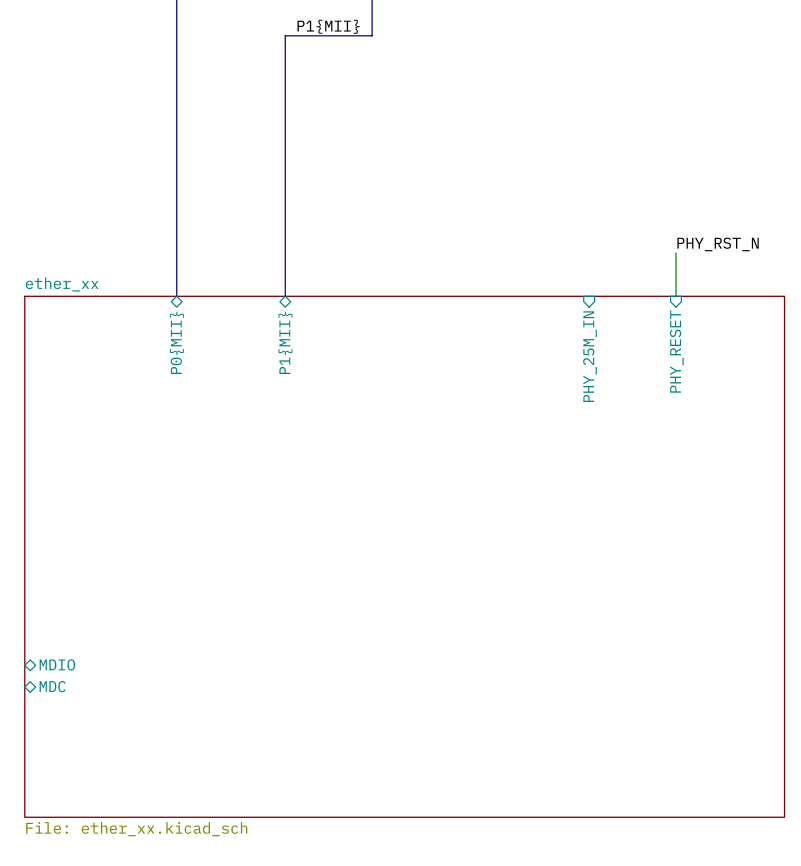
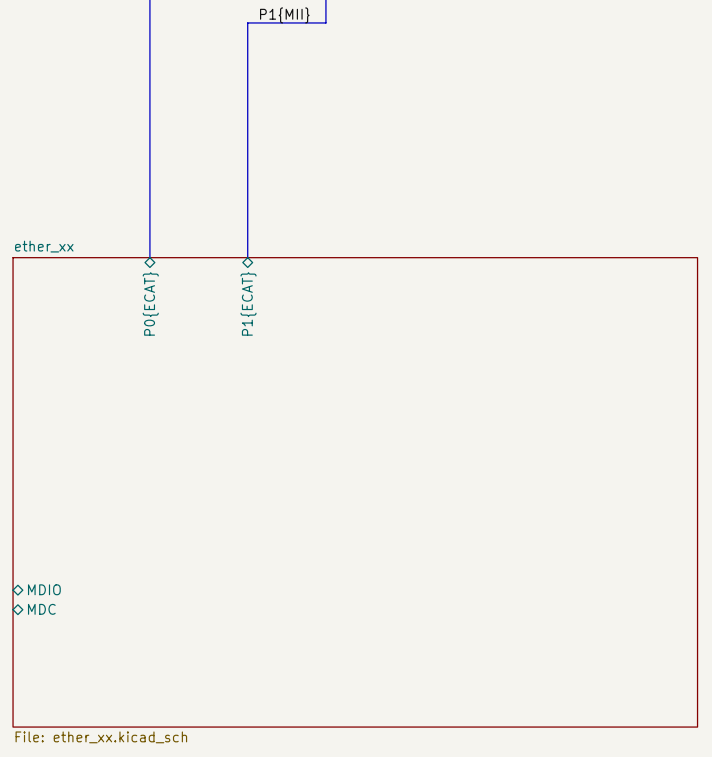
label: PHY_RST_N (718, 244) -> none
wire: (675, 252) (675, 296) -> none
sheet pin: P0{MII} (176, 342) -> P0{ECAT} (150, 303)
sheet pin: P1{MII} (285, 342) -> P1{ECAT} (248, 303)
sheet pin: PHY_RESET (676, 351) -> none
sheet pin: PHY_25M_IN (589, 356) -> none

